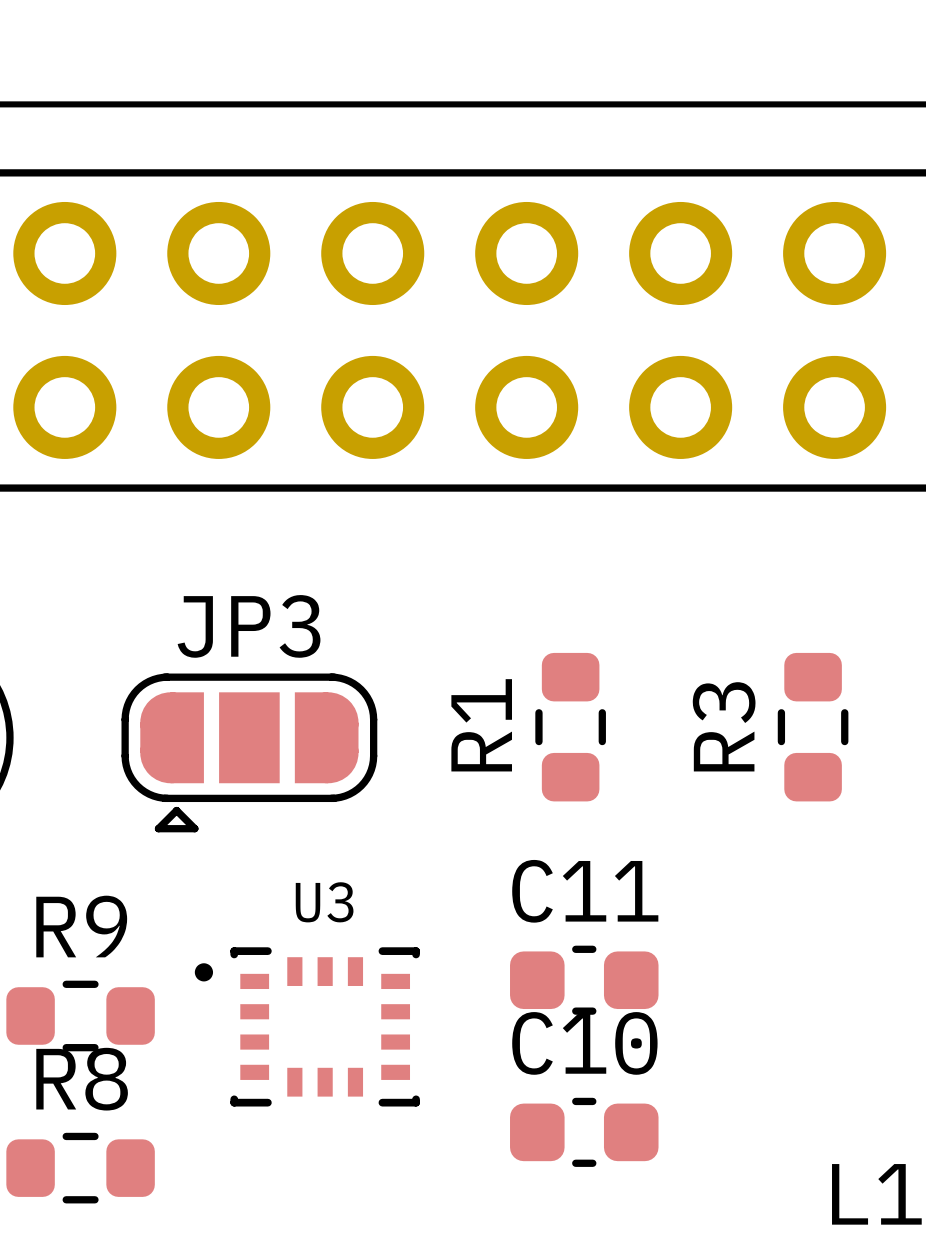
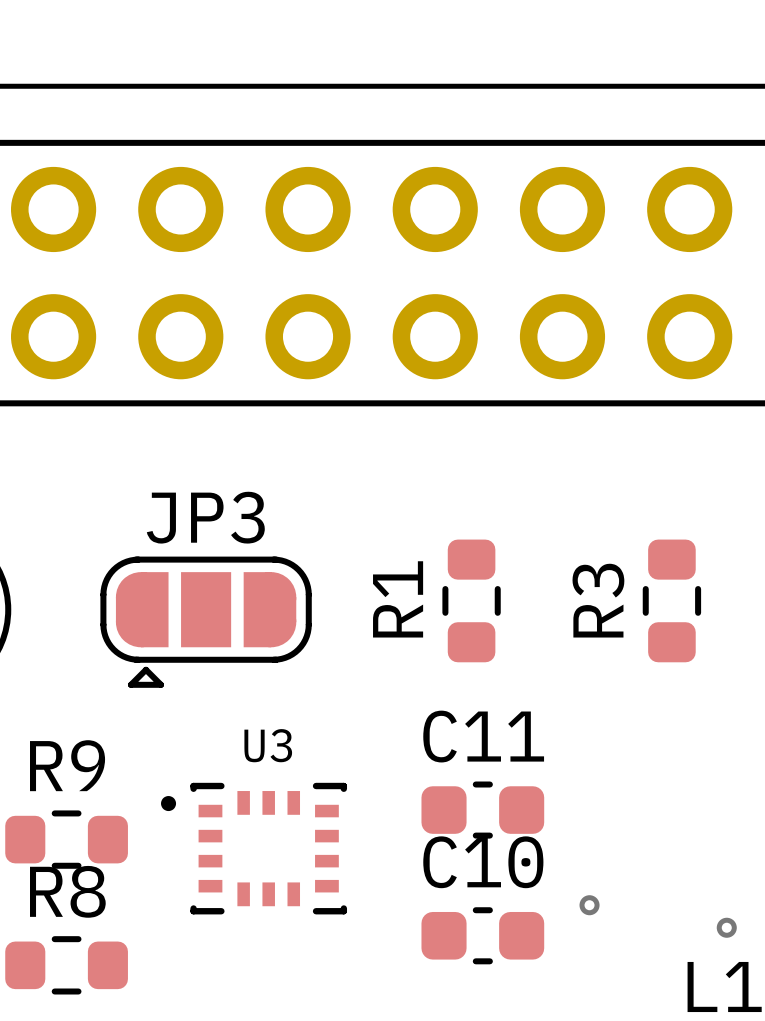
via: none -> (589, 905)
via: none -> (726, 927)

